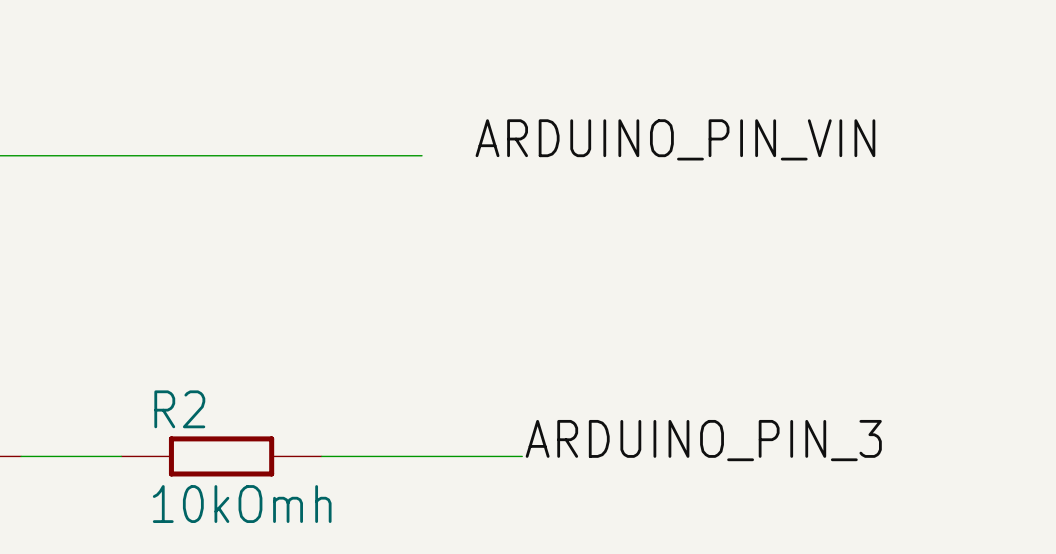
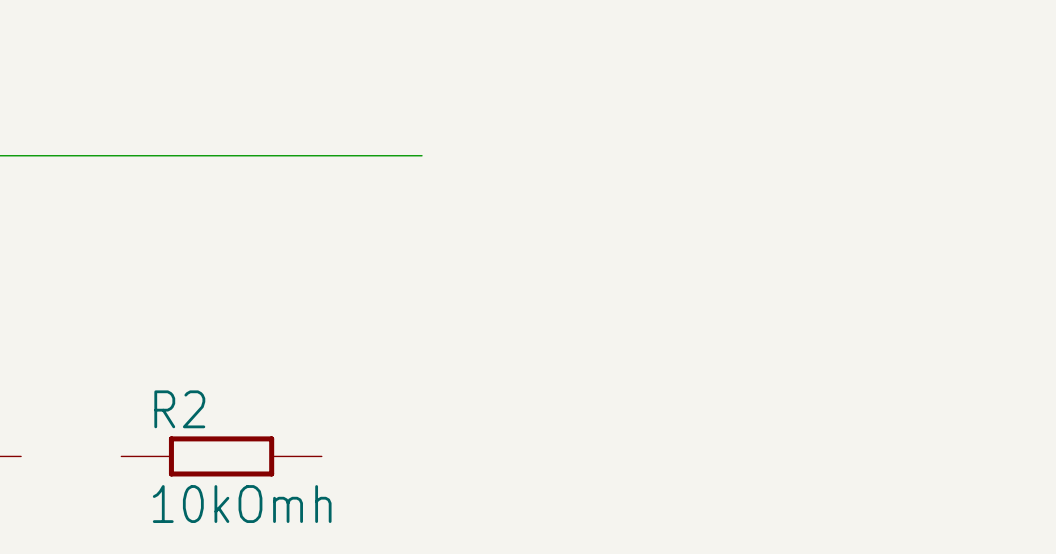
label: ARDUINO_PIN_VIN (675, 139) -> none
label: ARDUINO_PIN_3 (703, 440) -> none
wire: (21, 456) (121, 456) -> none
wire: (321, 456) (522, 456) -> none

